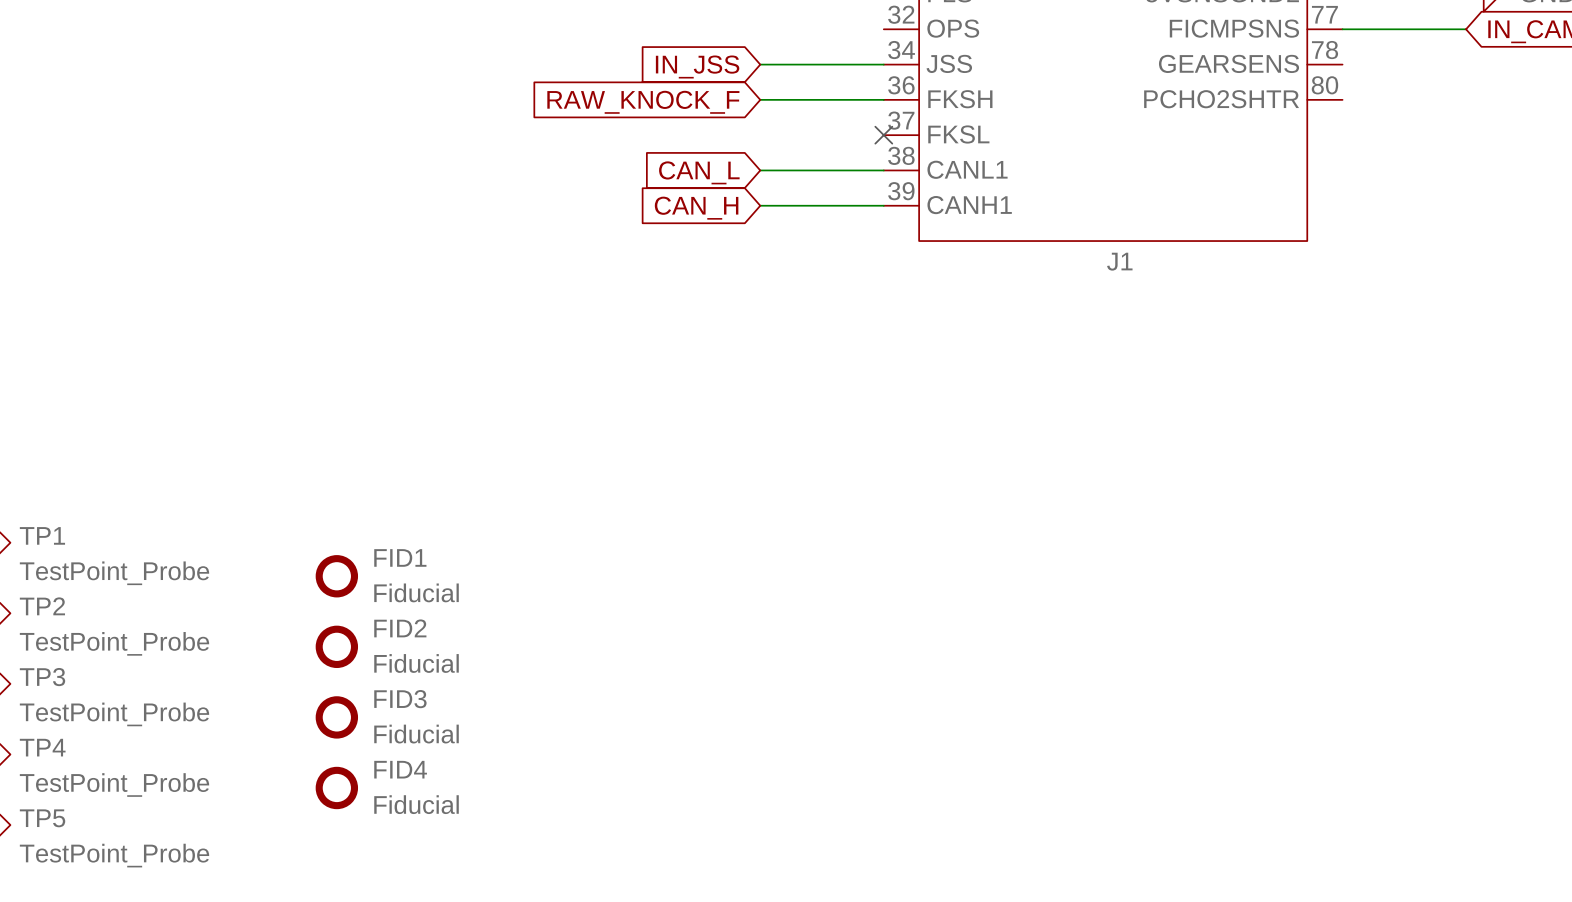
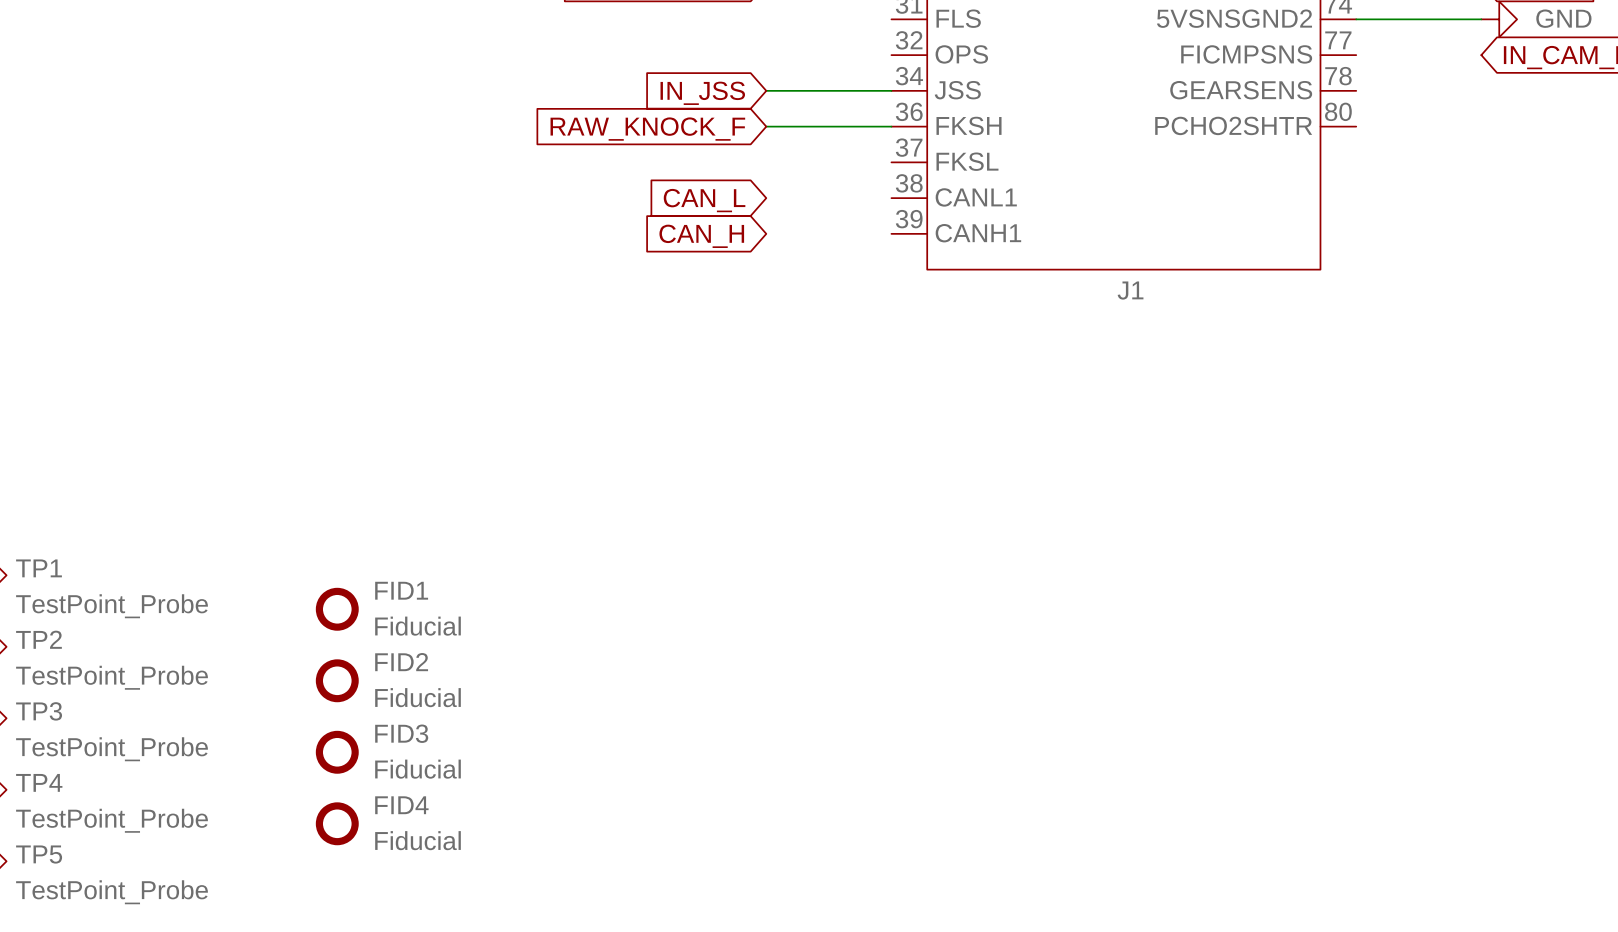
wire: (1342, 29) (1466, 29) -> none
no-connect mark: (883, 135) -> none
wire: (760, 170) (883, 170) -> none
wire: (760, 205) (883, 205) -> none

